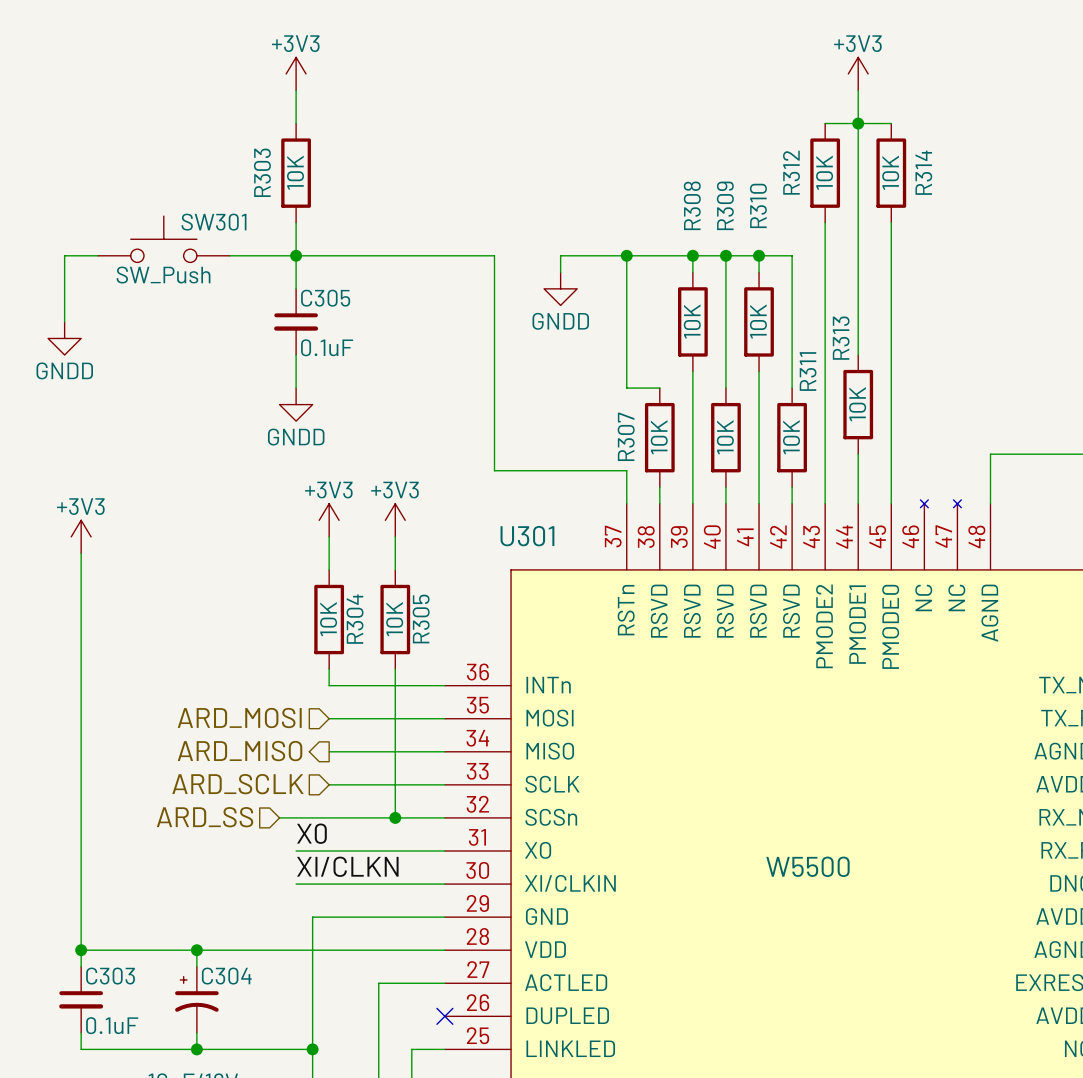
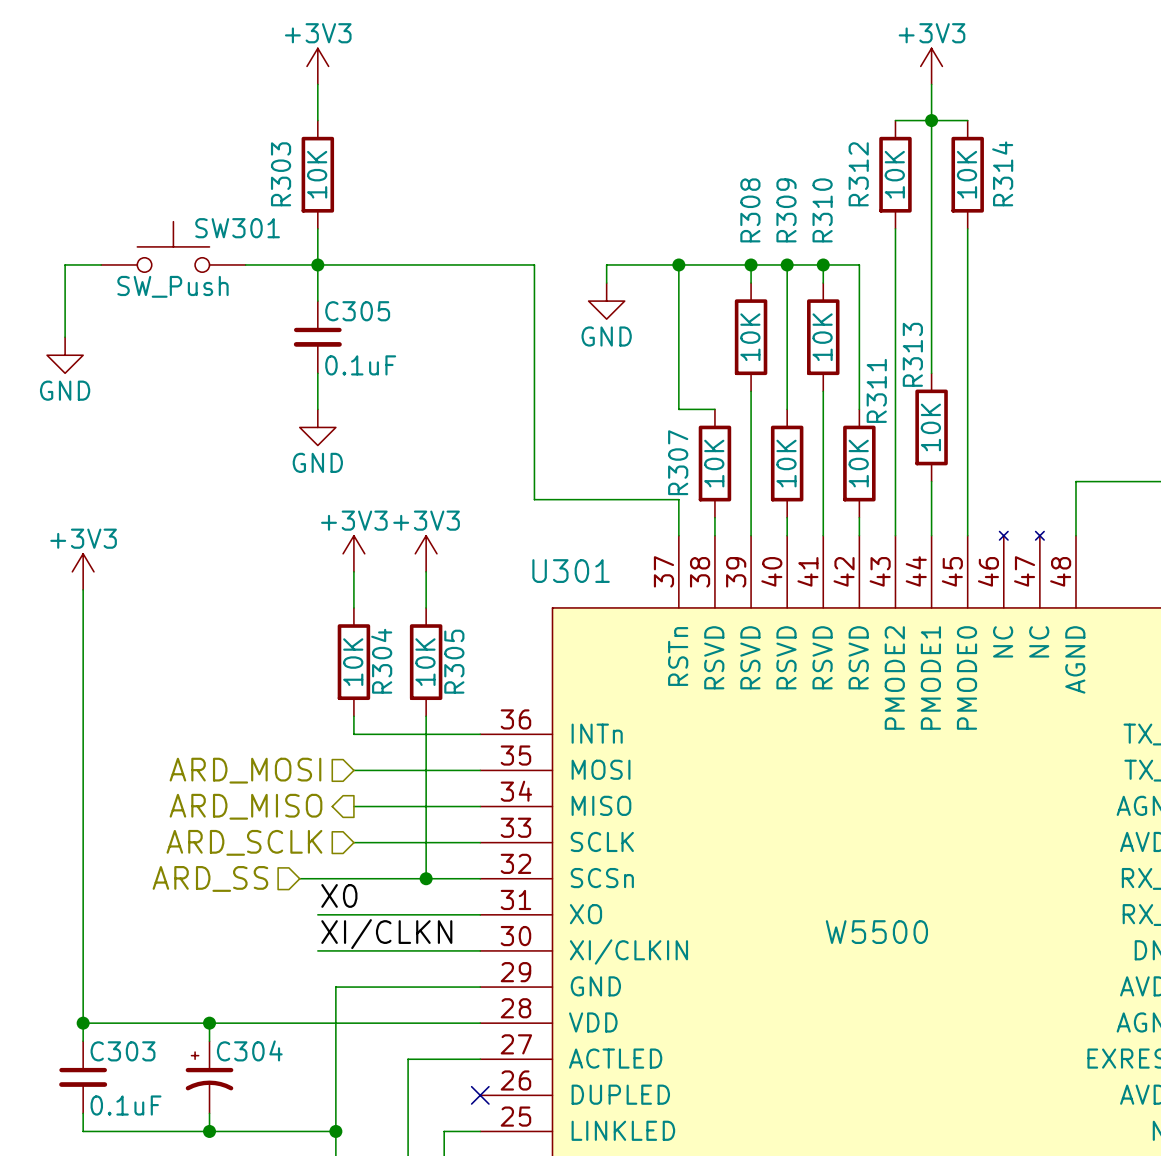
power symbol: GNDD (560, 288) -> GND (606, 301)
power symbol: GNDD (64, 338) -> GND (65, 355)
power symbol: GNDD (296, 404) -> GND (317, 427)

